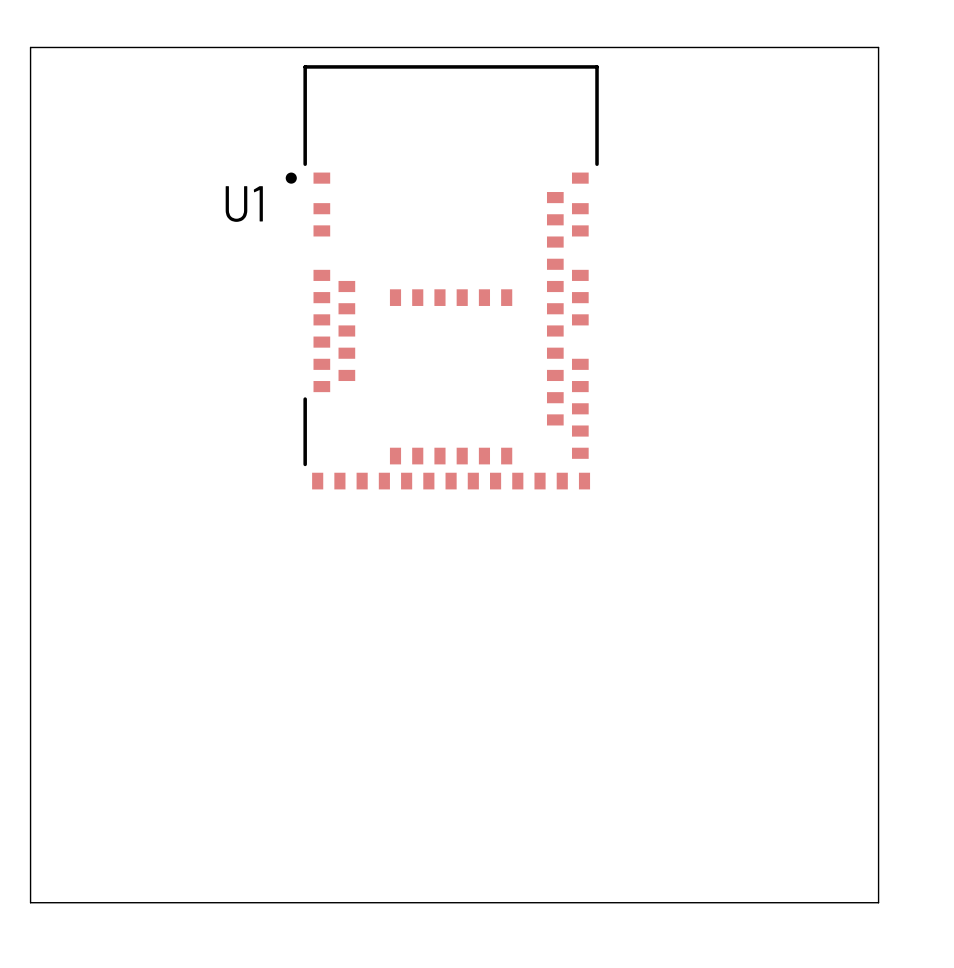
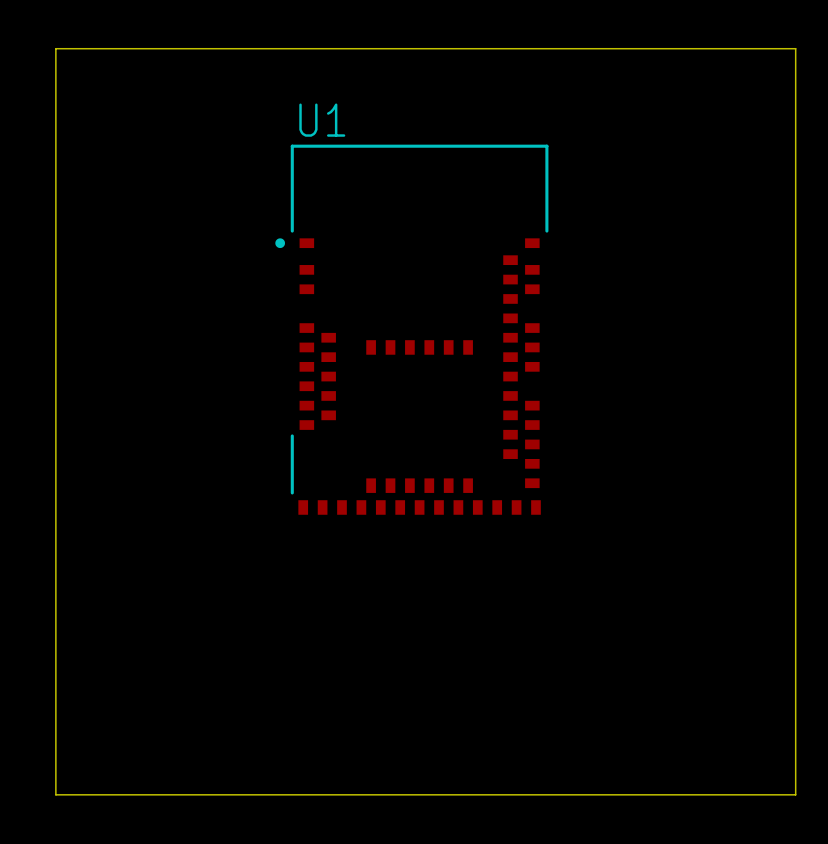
U1 name position: U1 (244, 204) -> U1 (322, 120)
U1 position: (442, 277) -> (411, 329)

